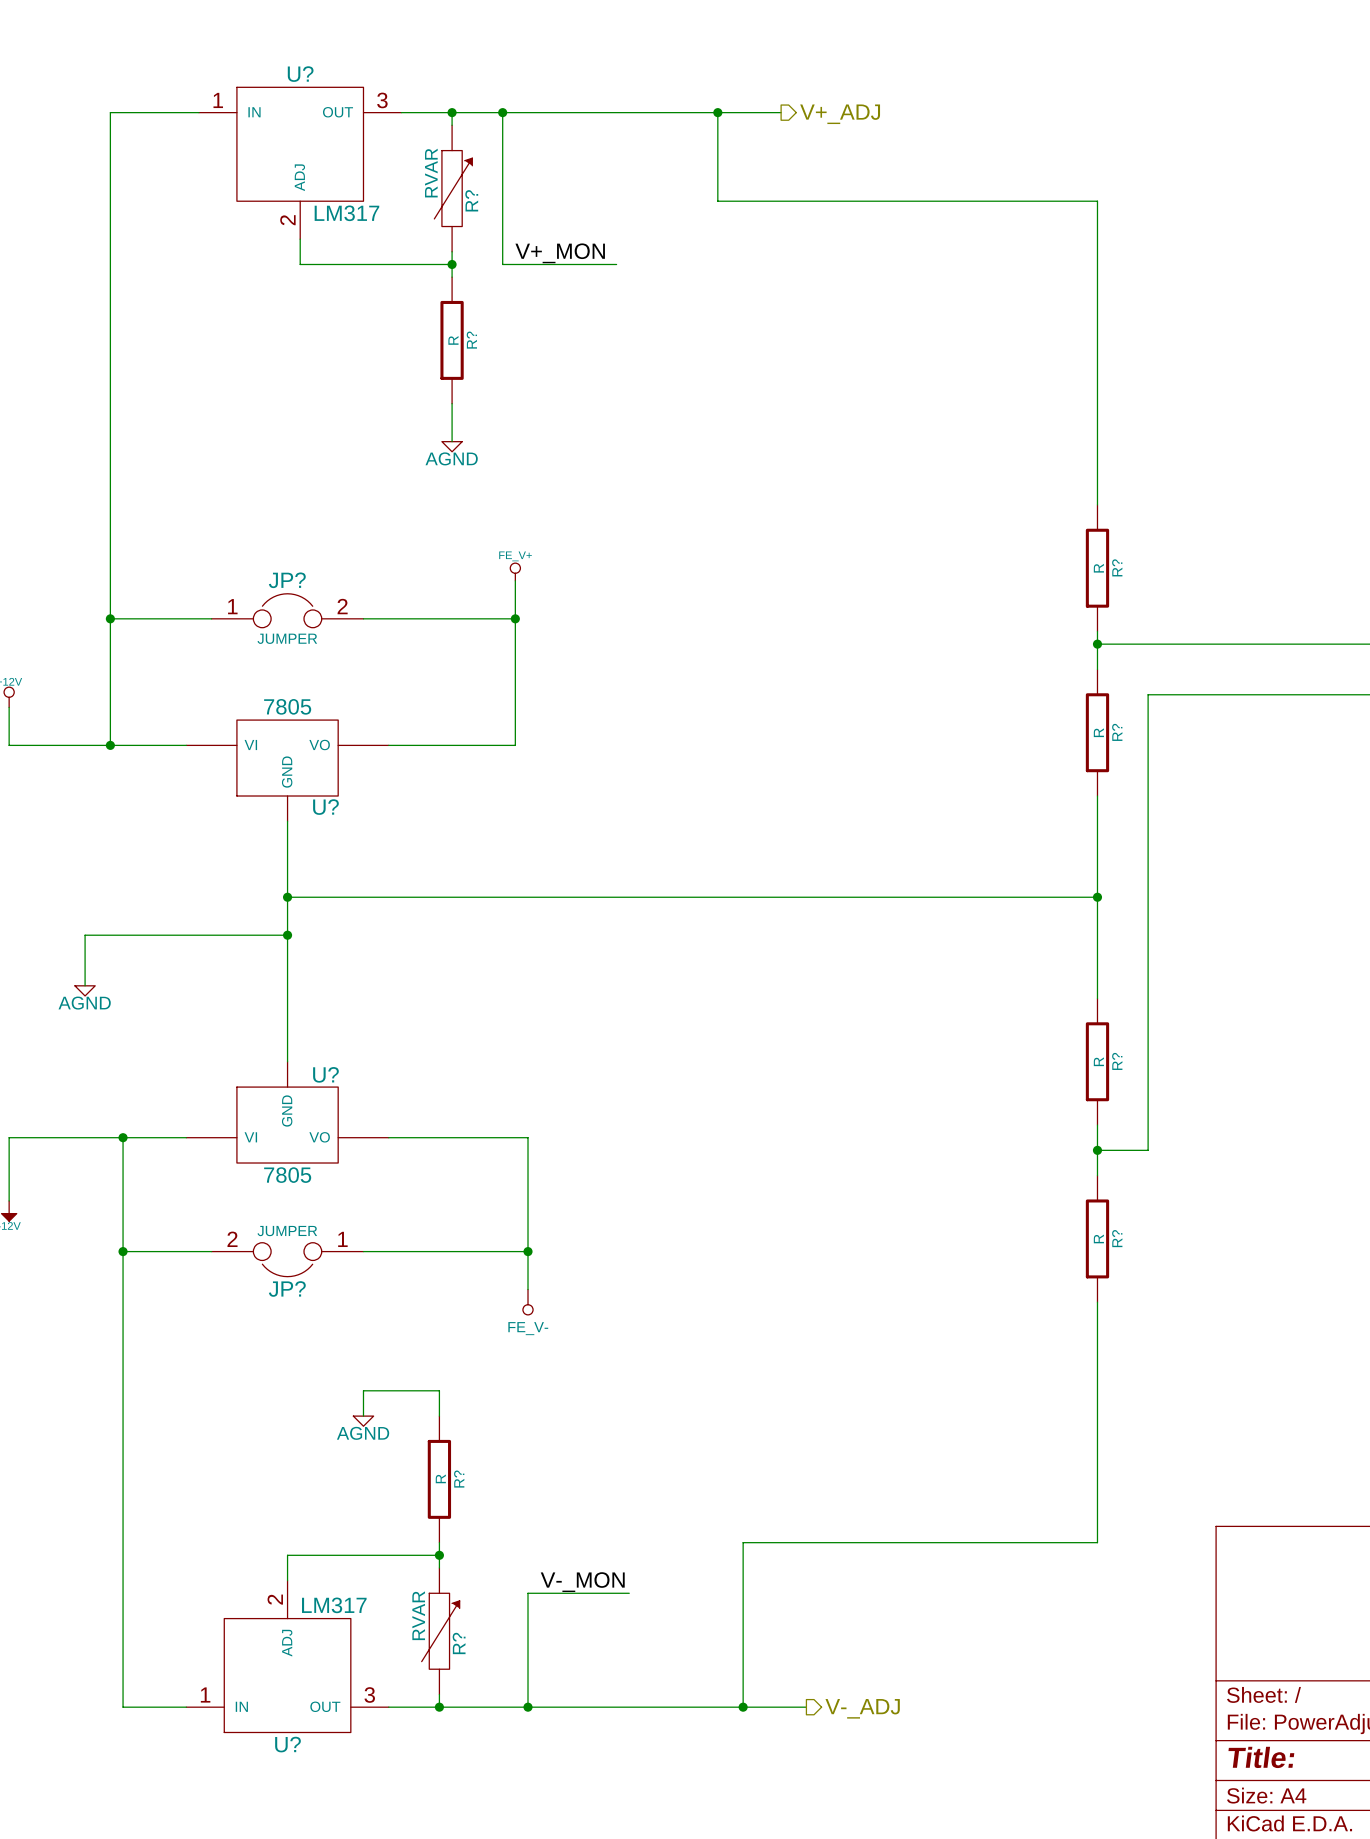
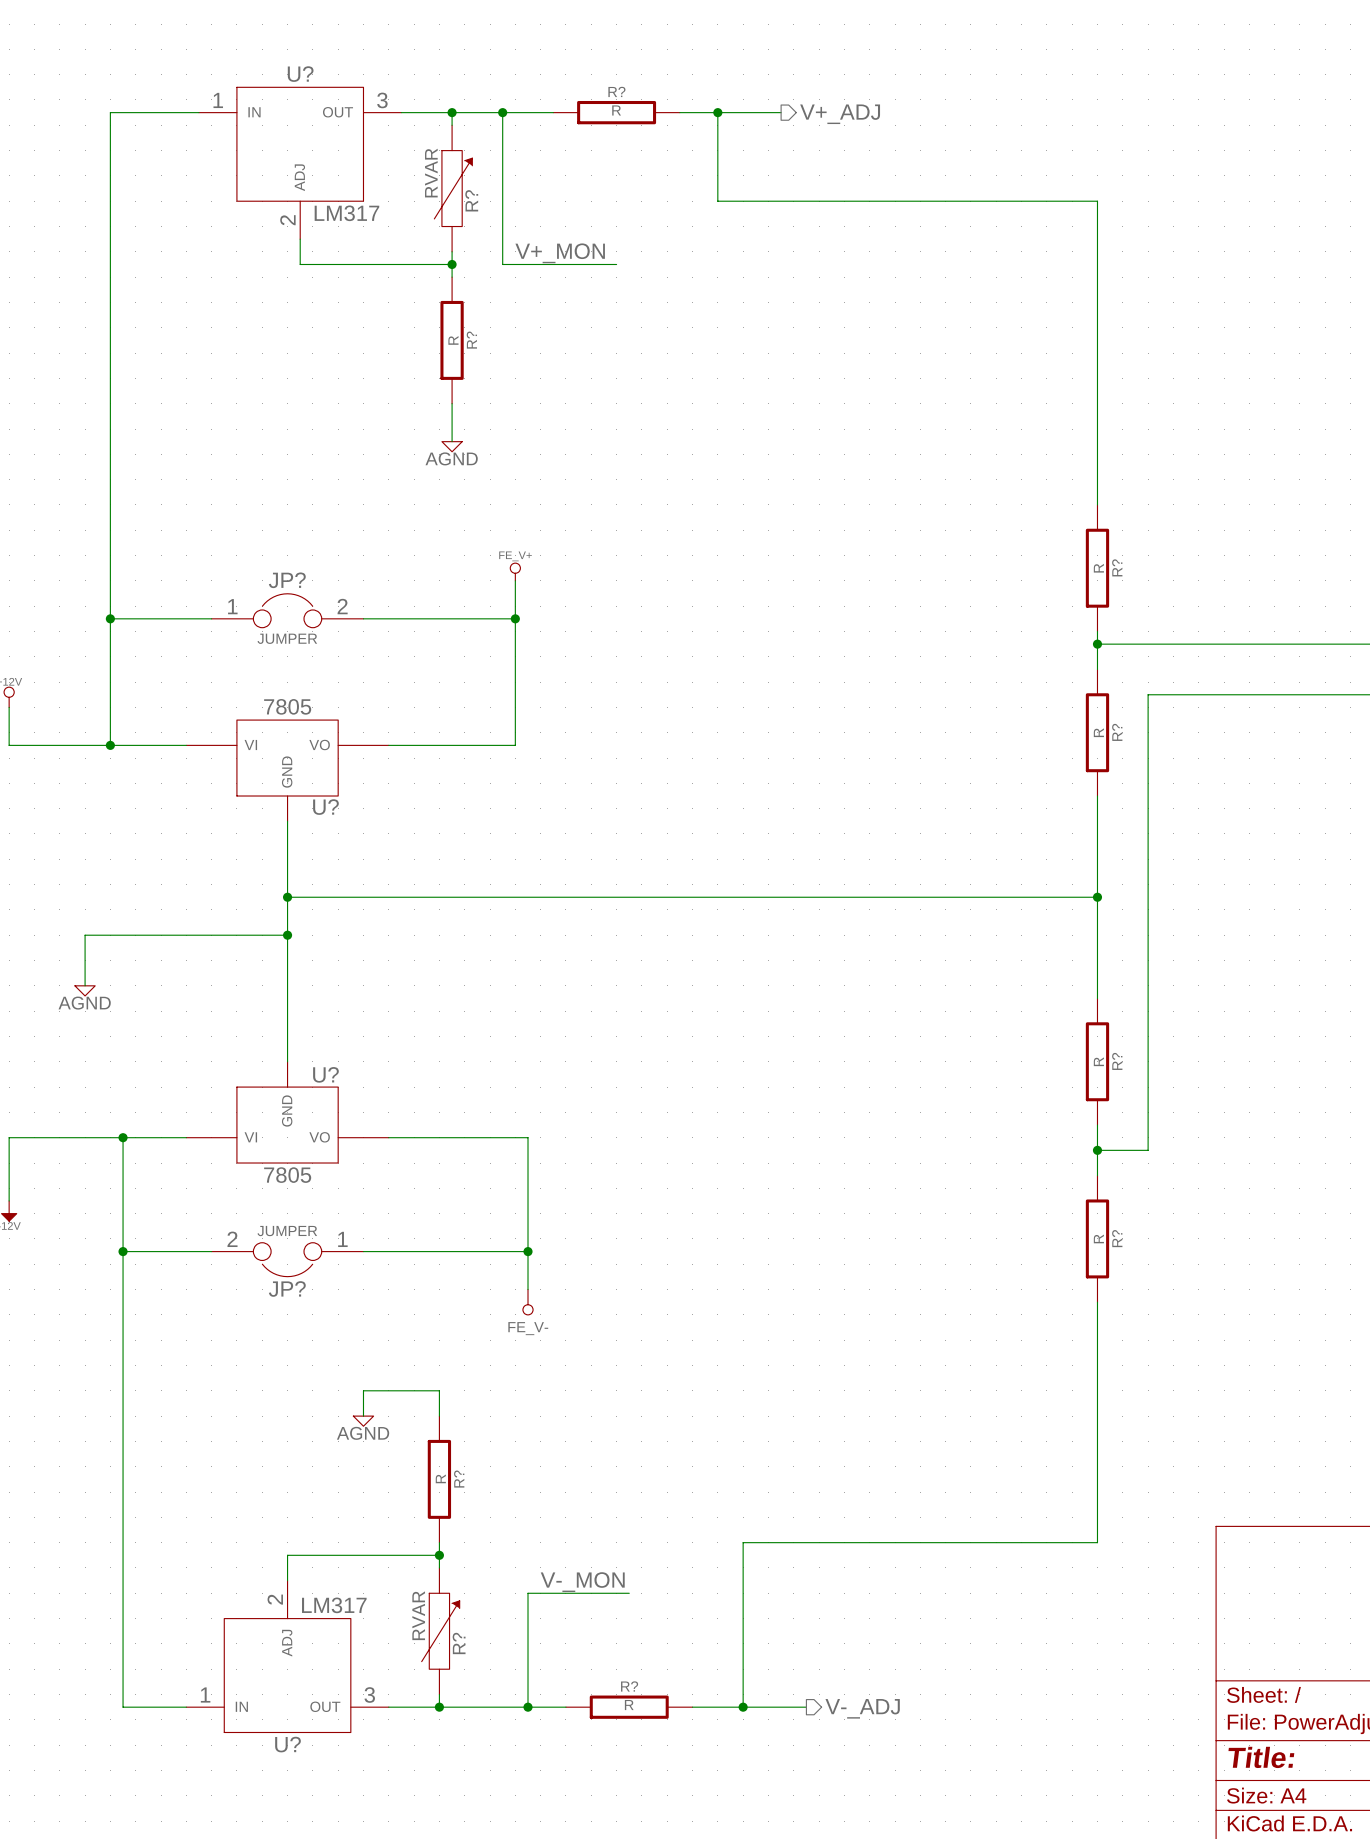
wire: (553, 112) (679, 112) -> none
R?: none -> R (616, 112)
wire: (565, 1707) (692, 1707) -> none
R?: none -> R (629, 1707)

